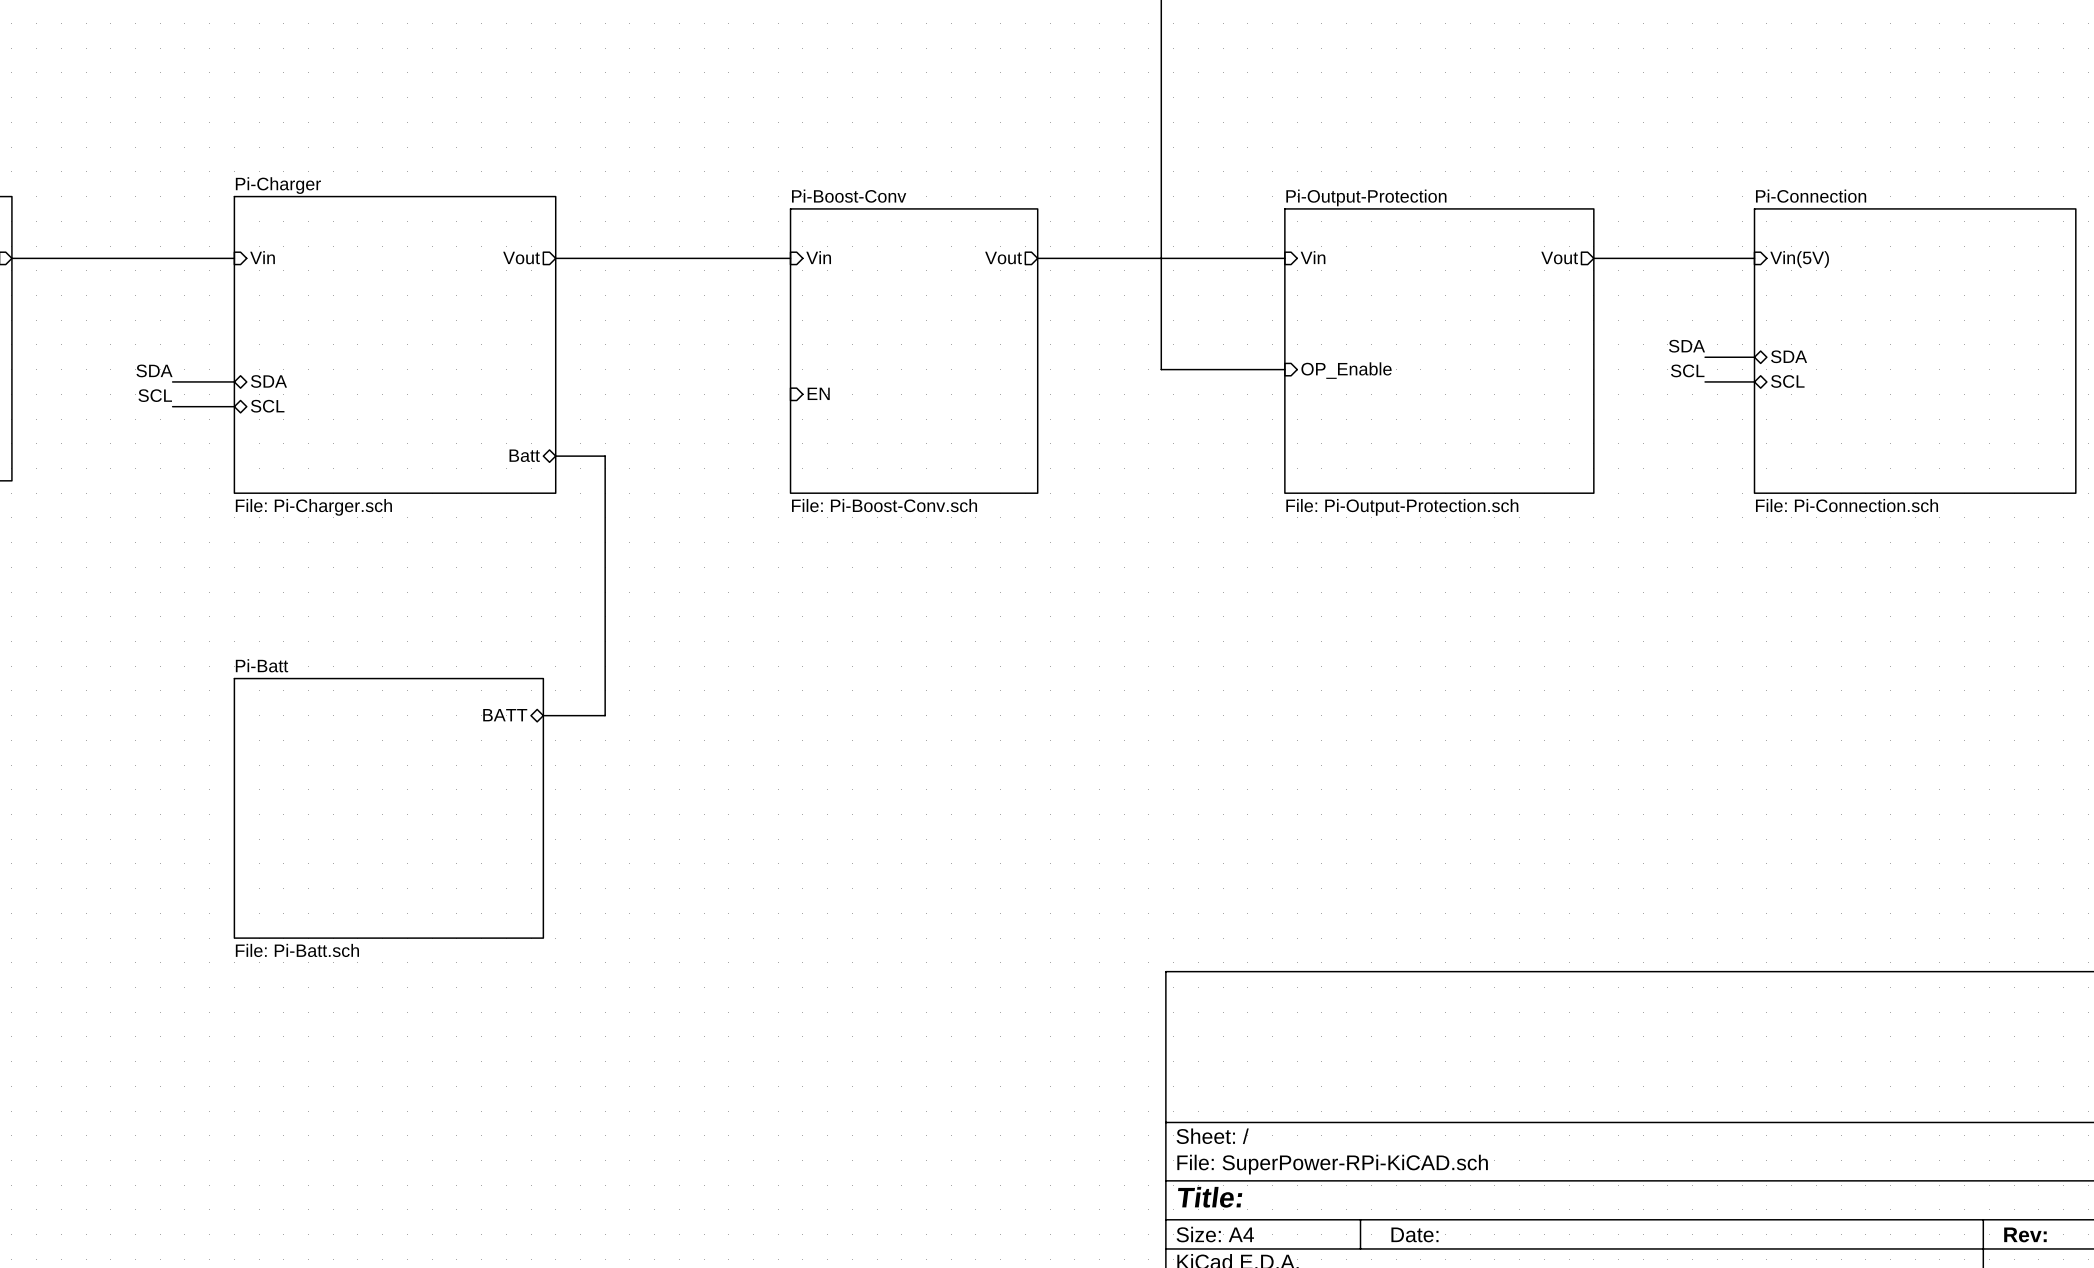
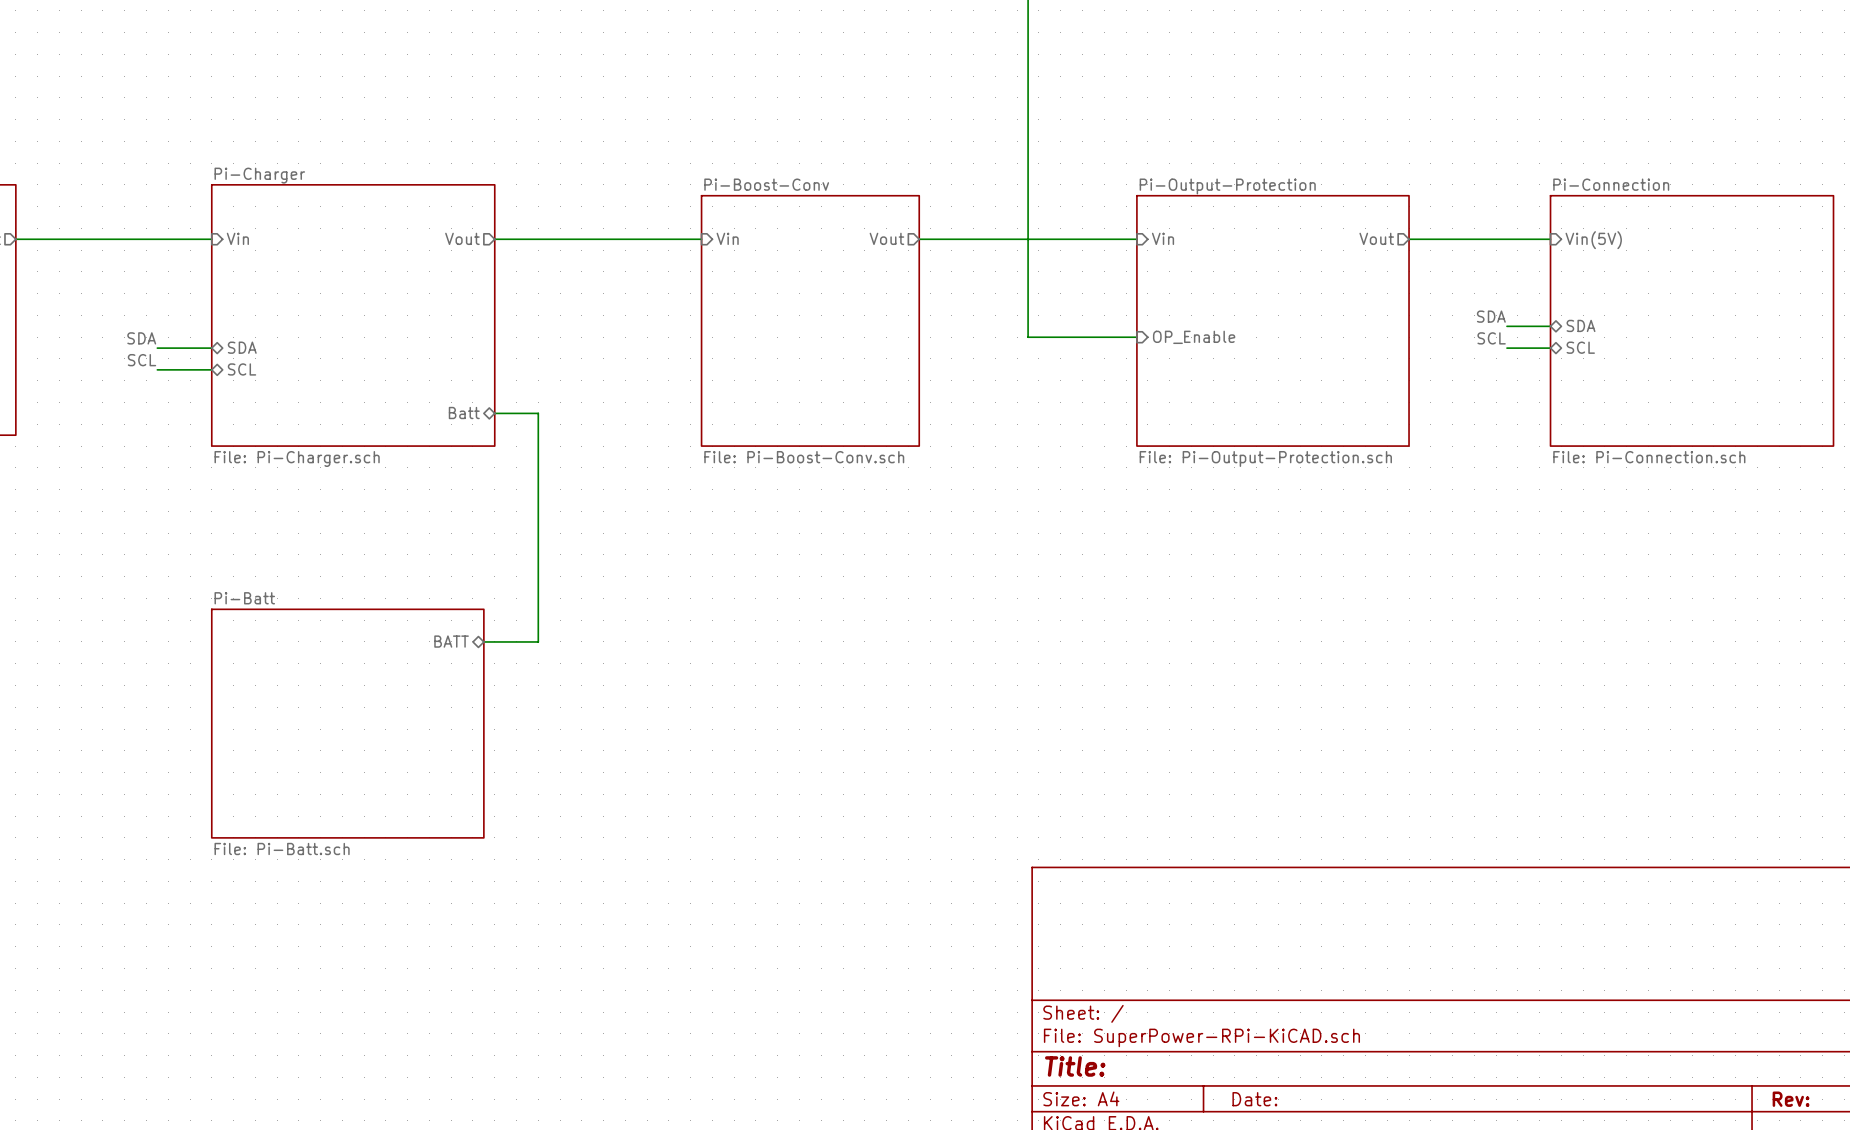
sheet pin: EN (818, 393) -> none

